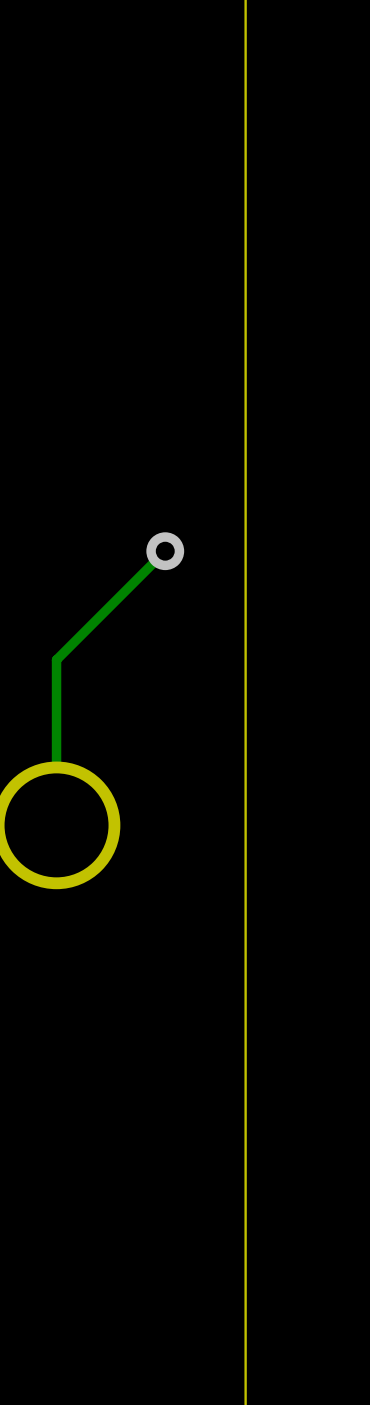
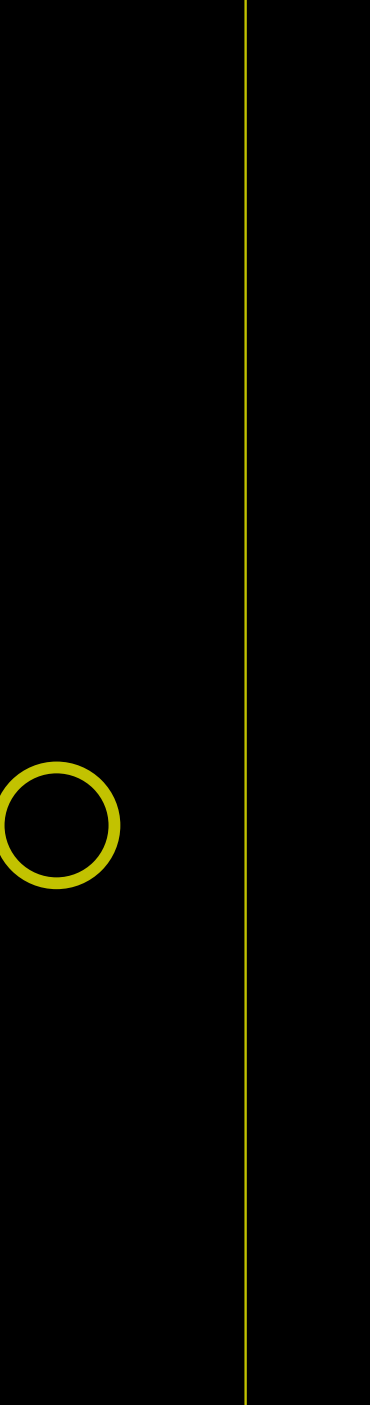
track: (165, 551) (56, 659) (56, 825) -> none
via: (165, 551) -> none

